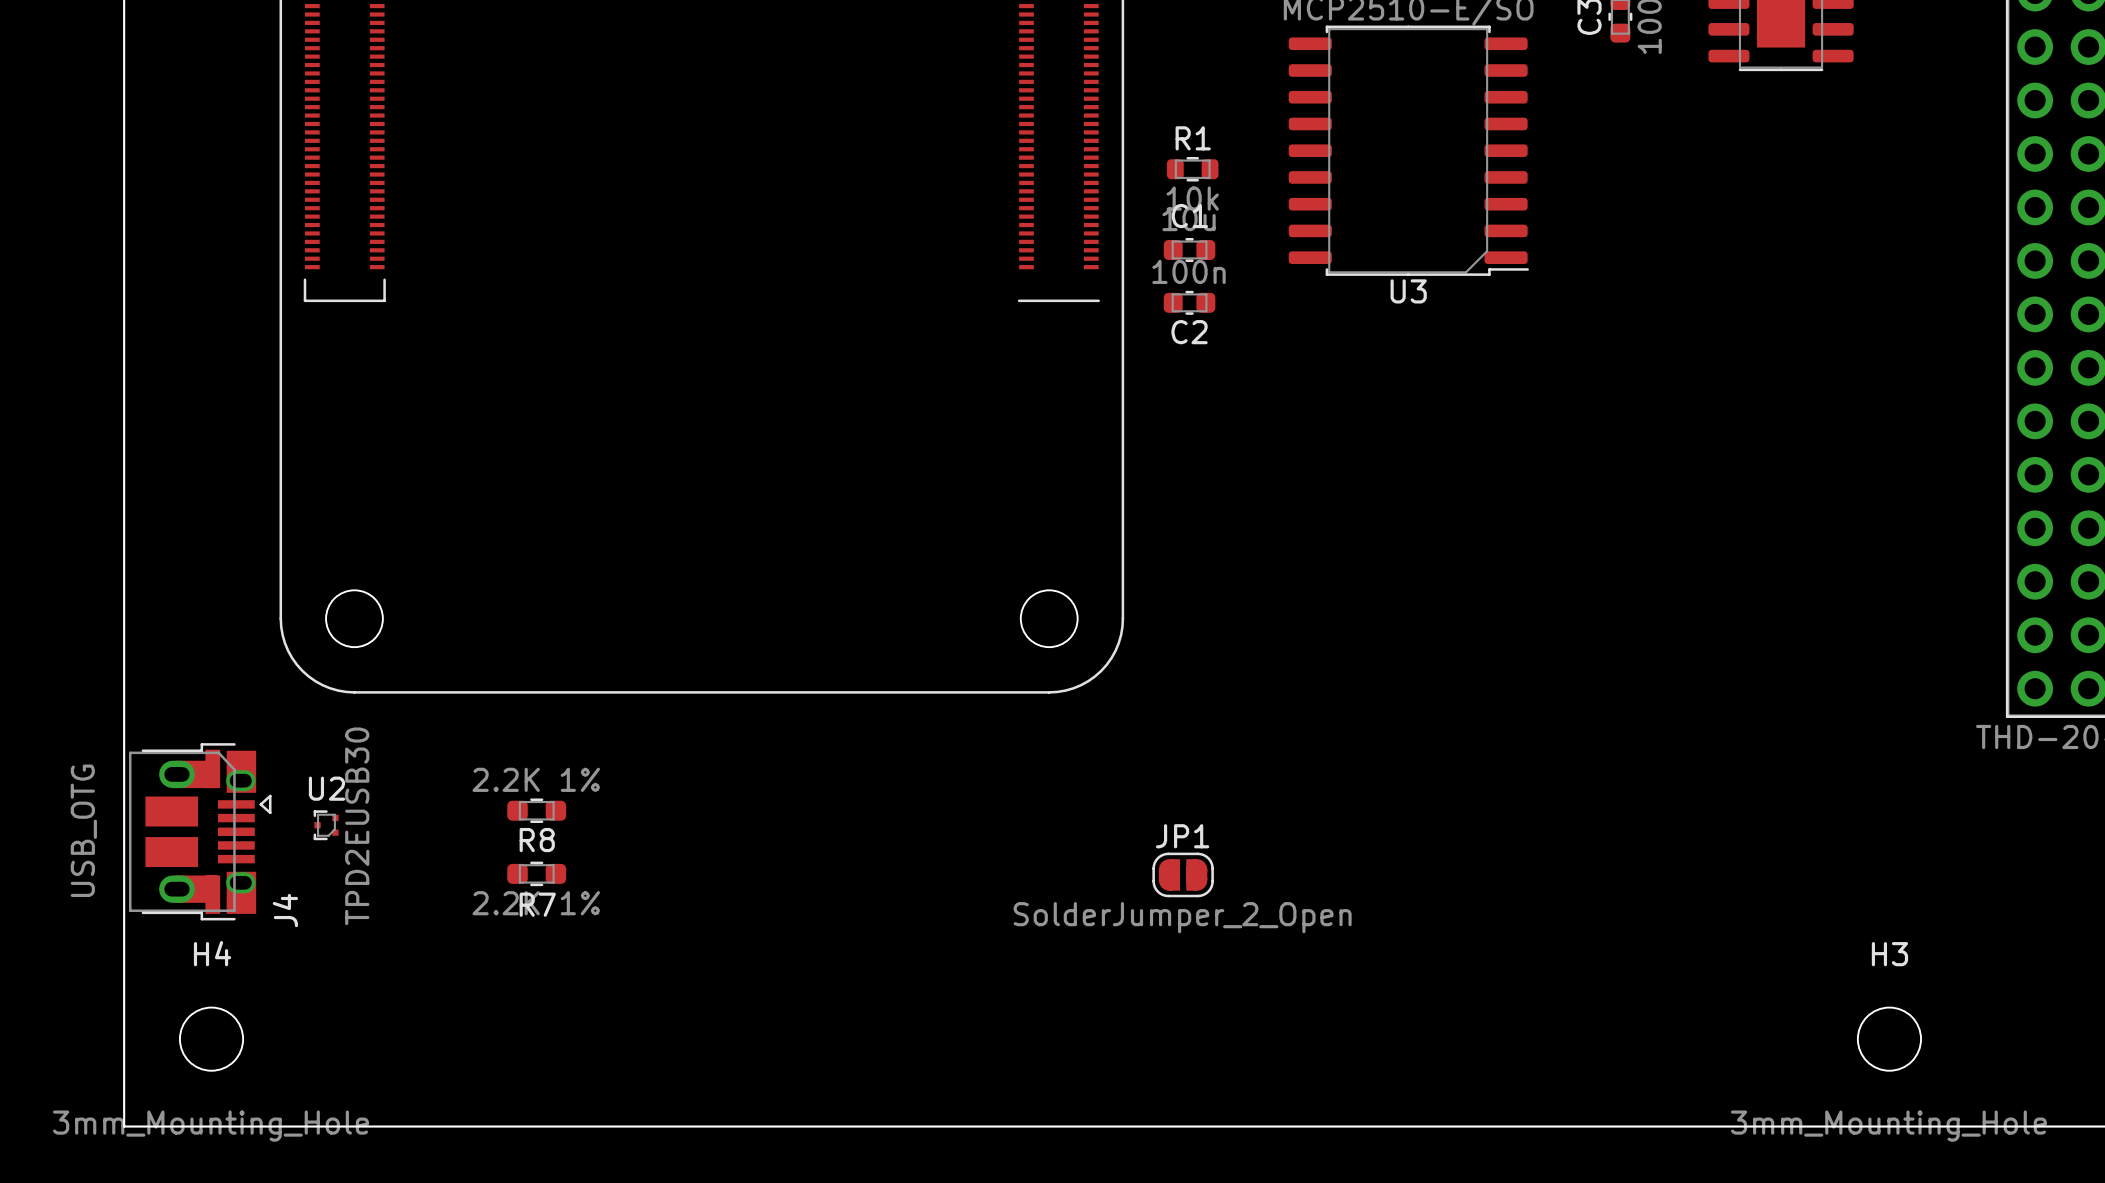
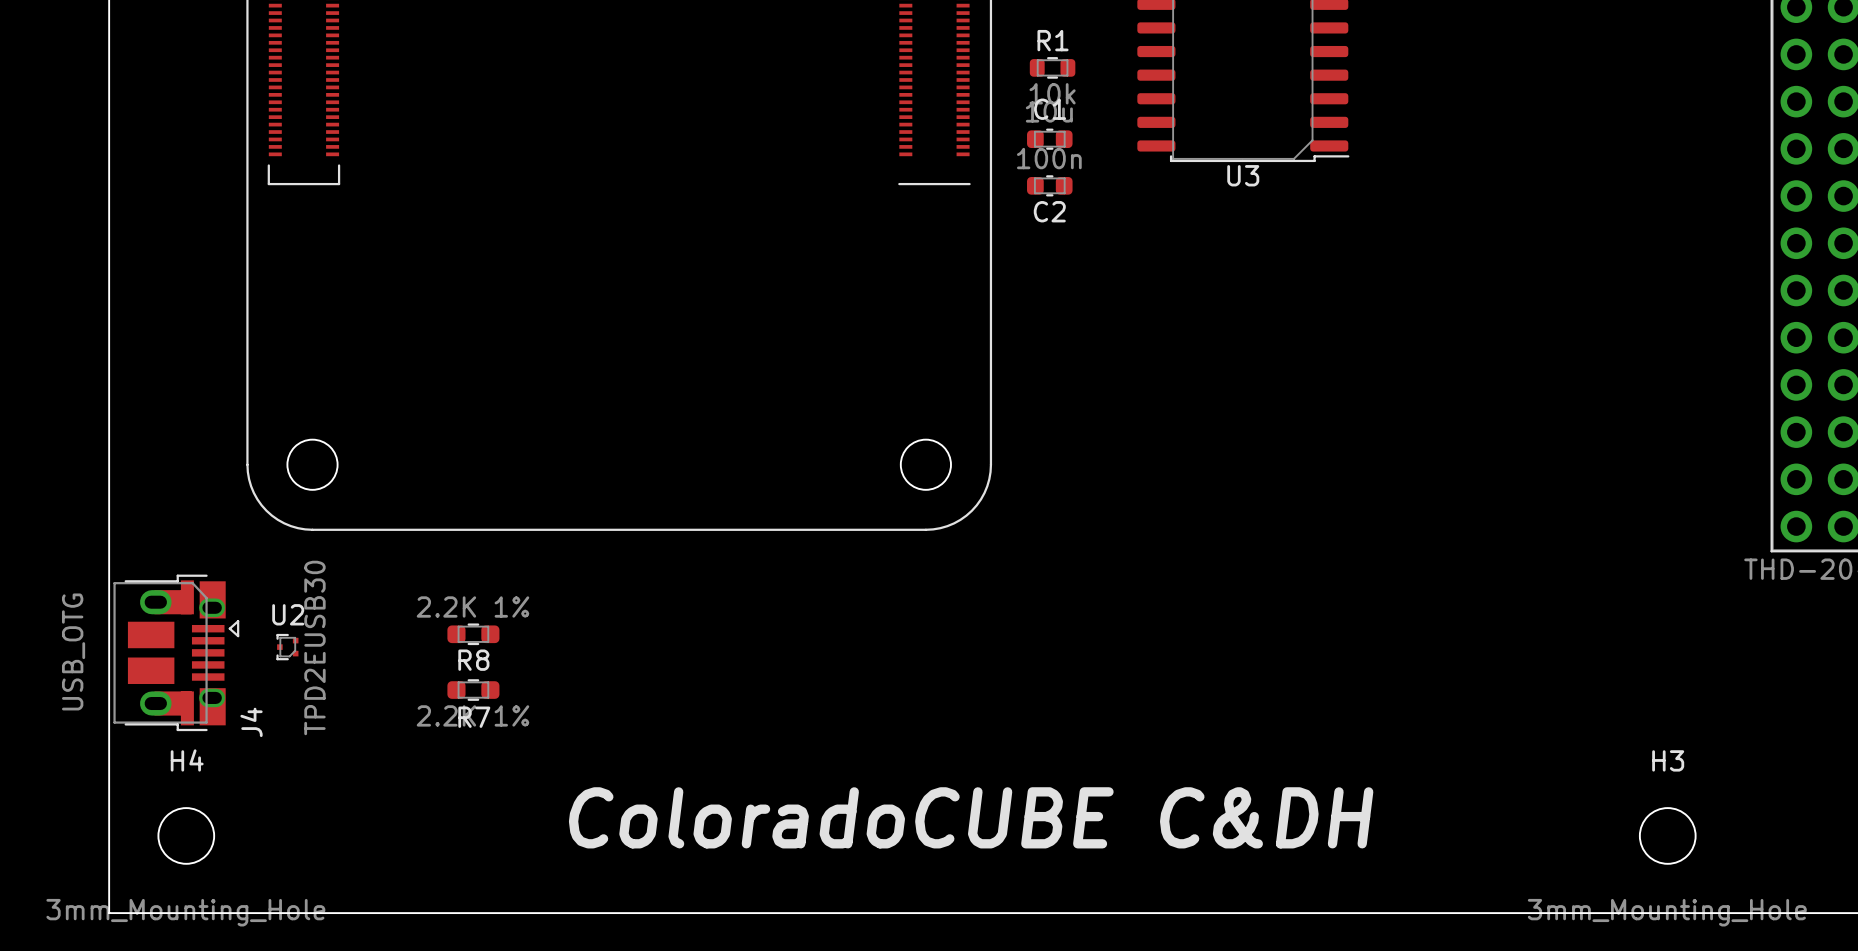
JP1: SolderJumper_2_Open (1183, 874) -> none
text: none -> ColoradoCUBE C&DH (971, 817)

